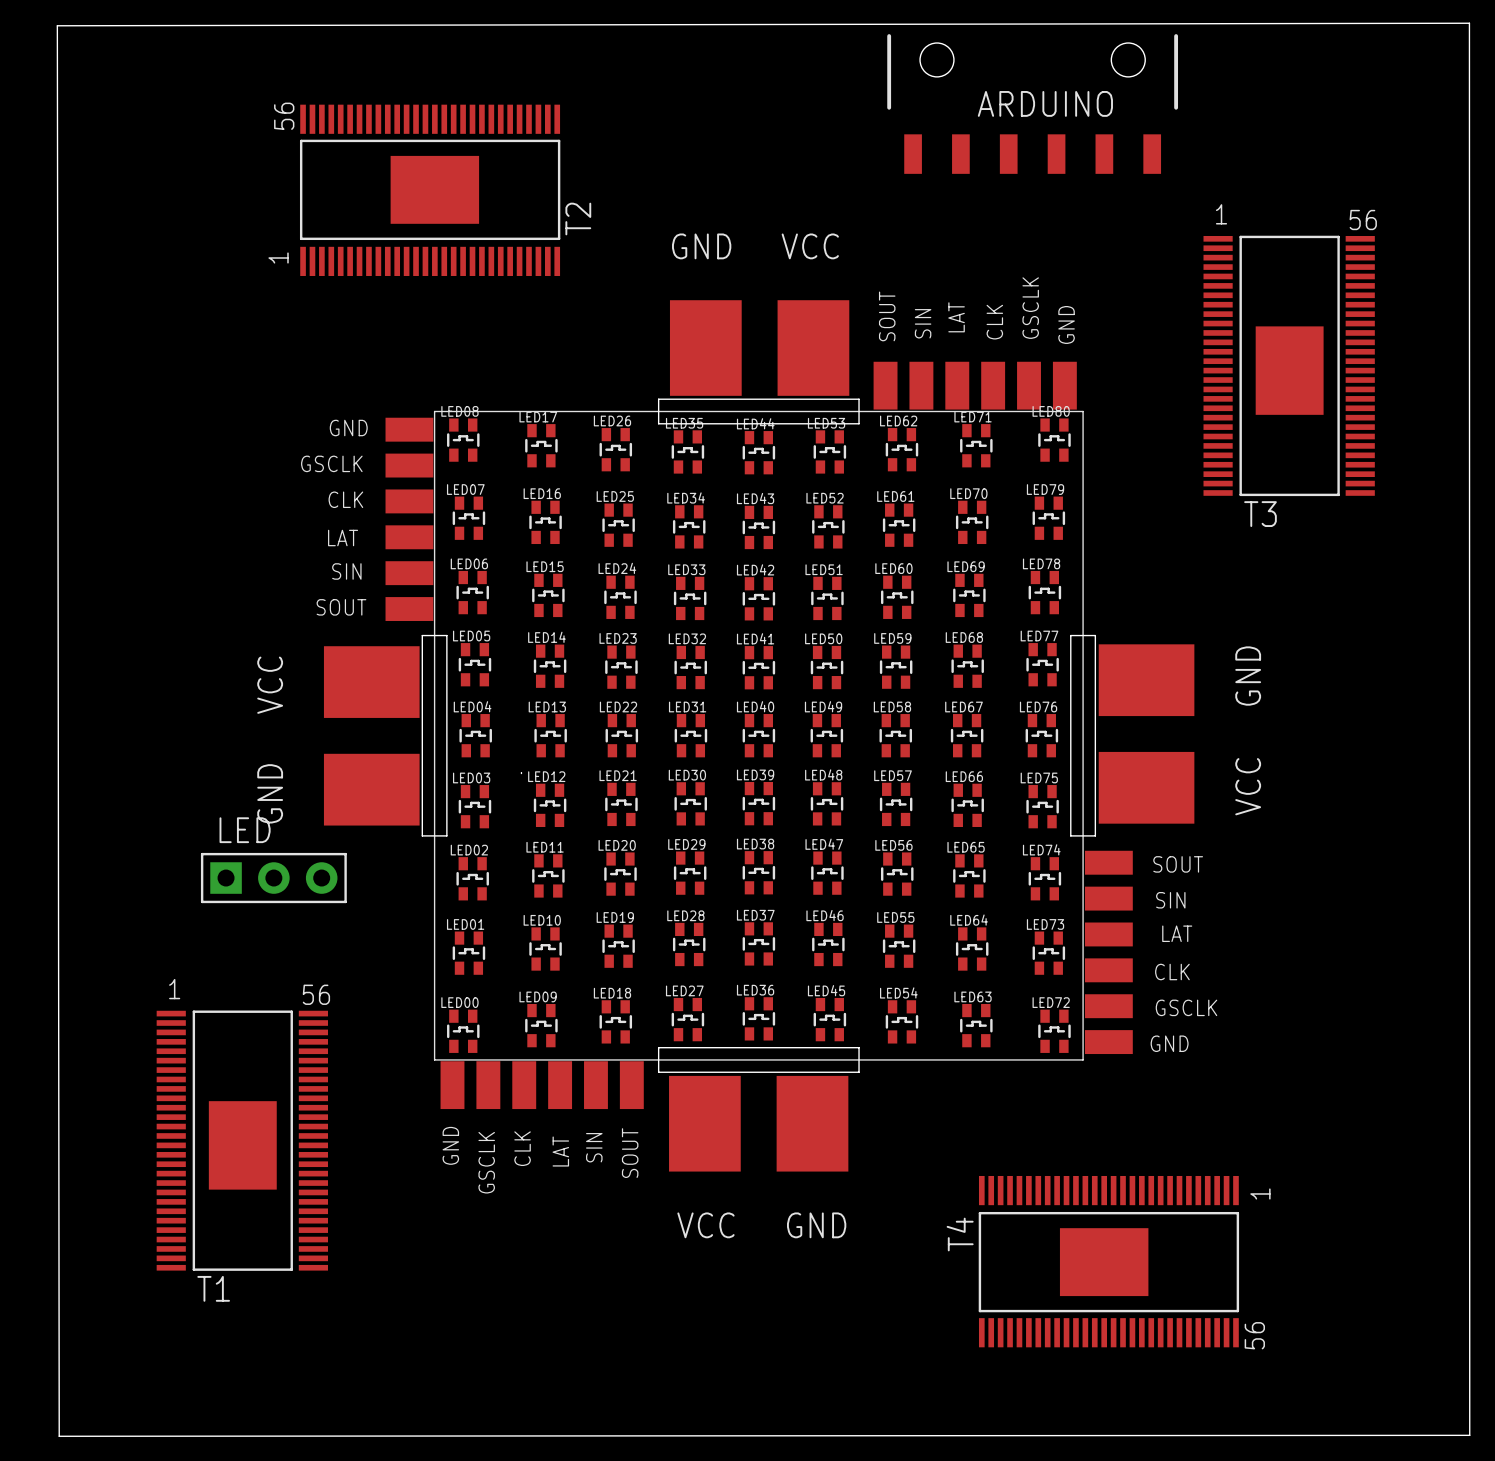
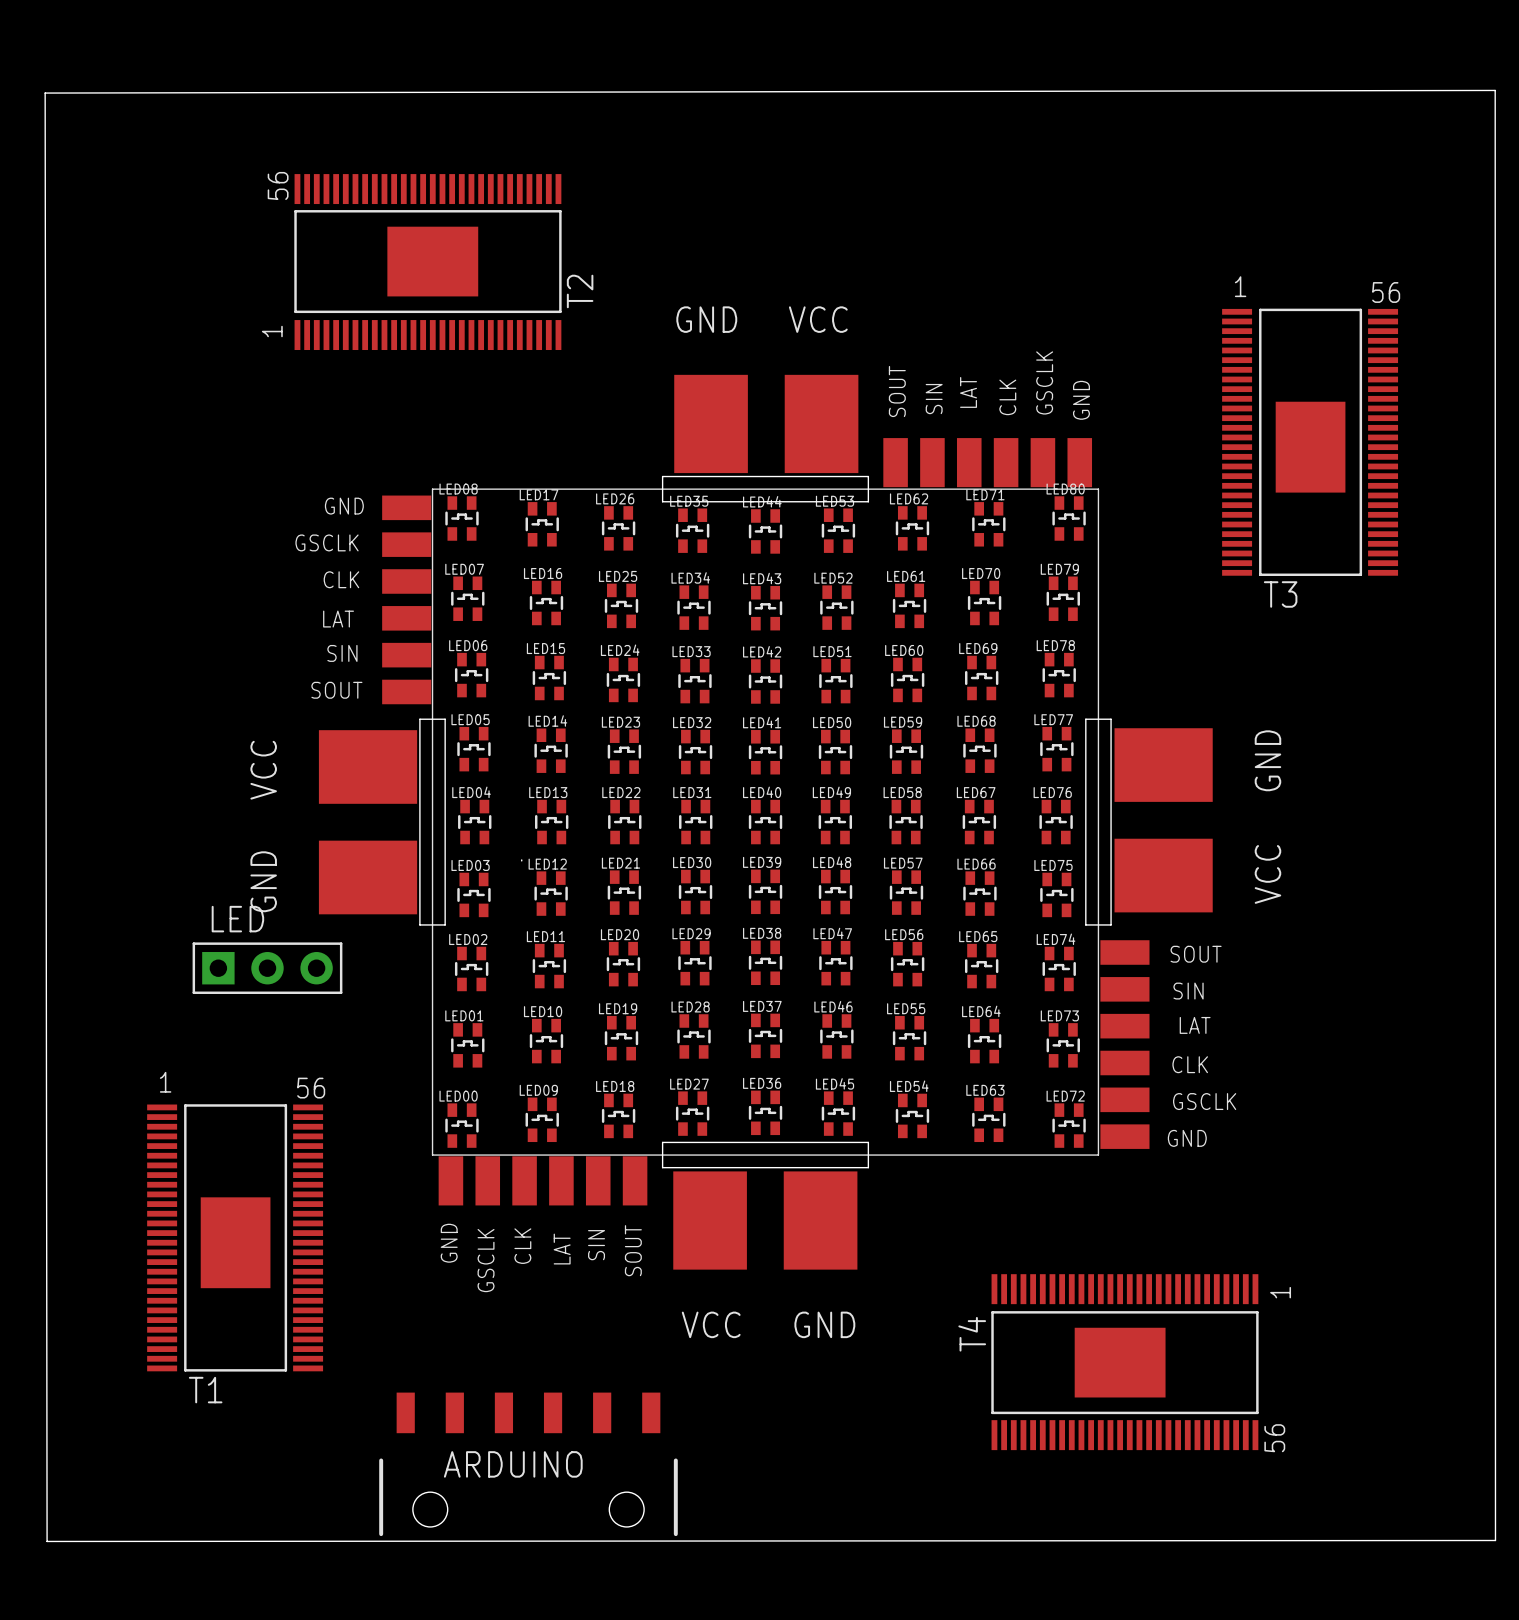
ARDUINO: (1032, 103) -> none
ARDUINO: none -> (528, 1464)

